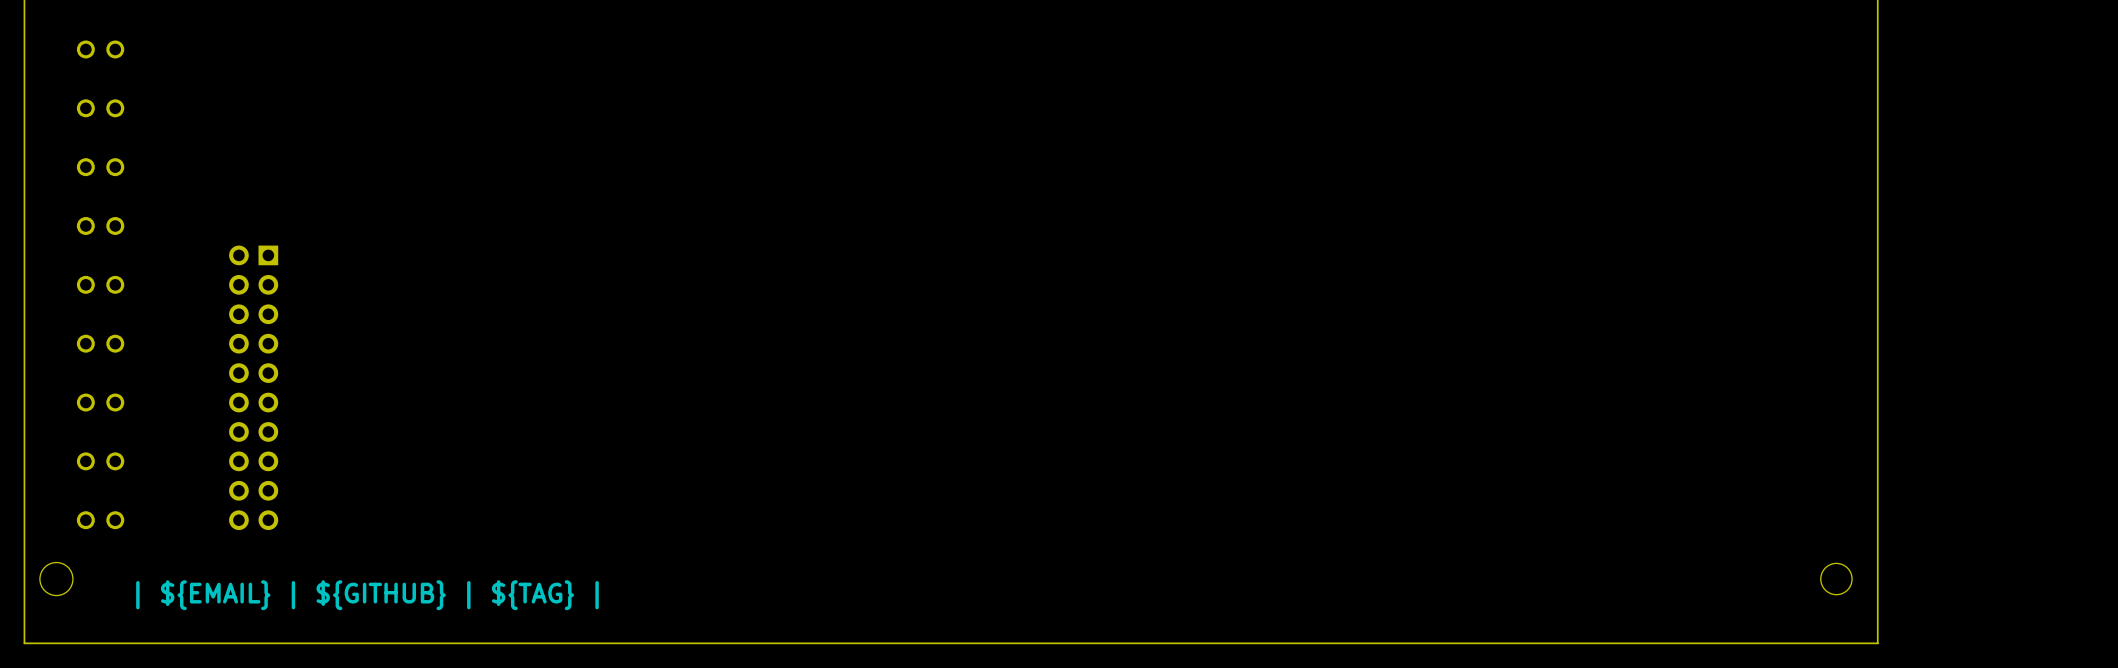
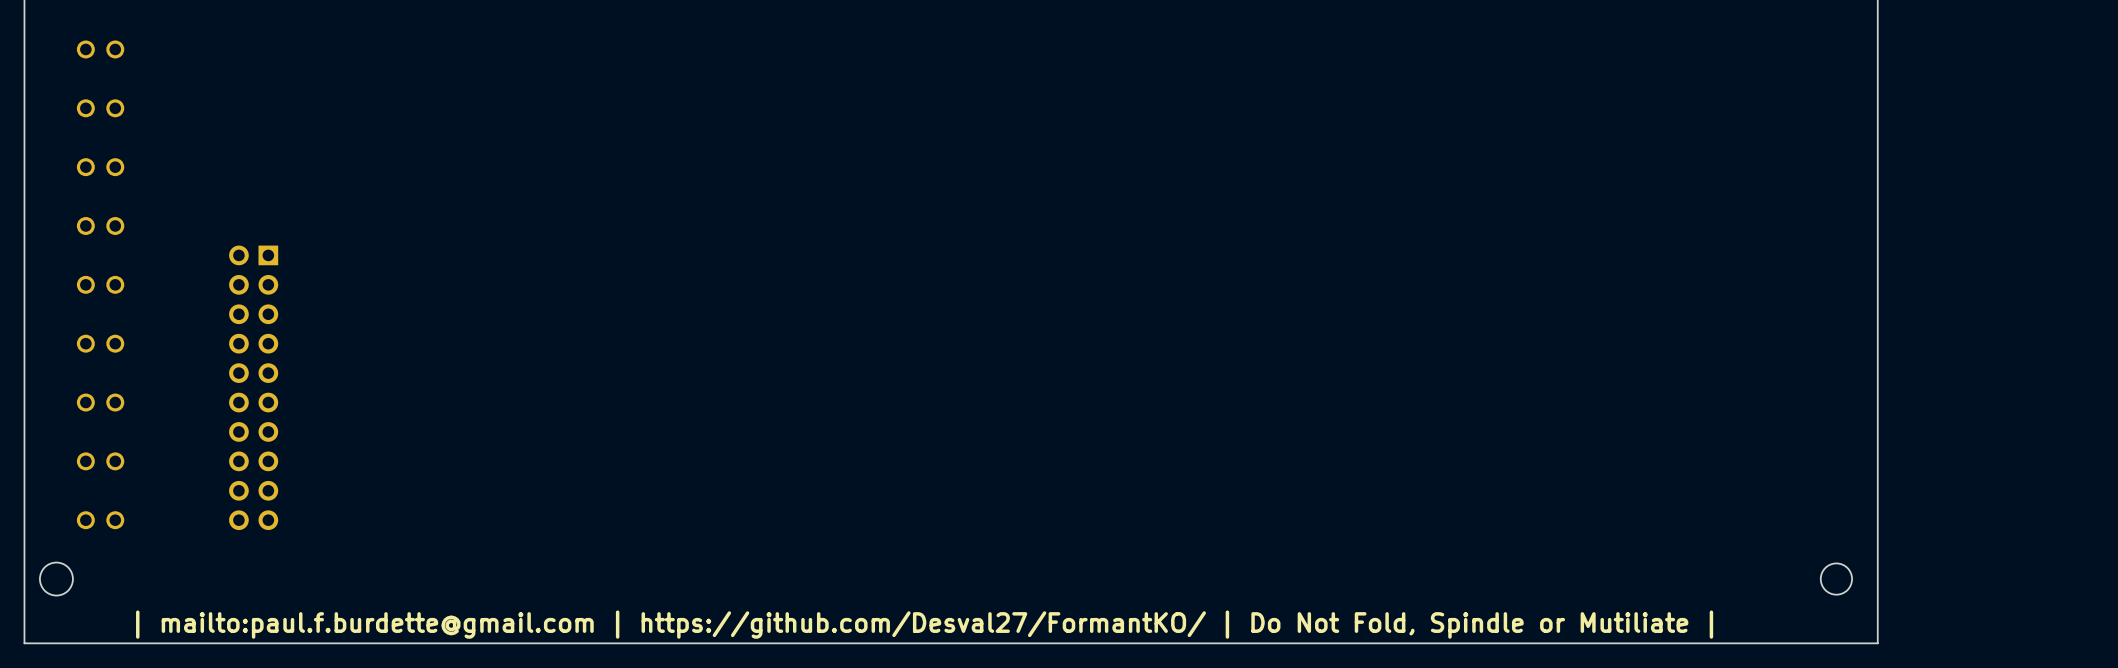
text: | ${EMAIL} | ${GITHUB} | ${TAG} | (367, 595) -> none
text: none -> | mailto:paul.f.burdette@gmail.com | https://github.com/Desval27/FormantKO/ | Do Not Fold, Spindle or Mutiliate | (924, 624)

